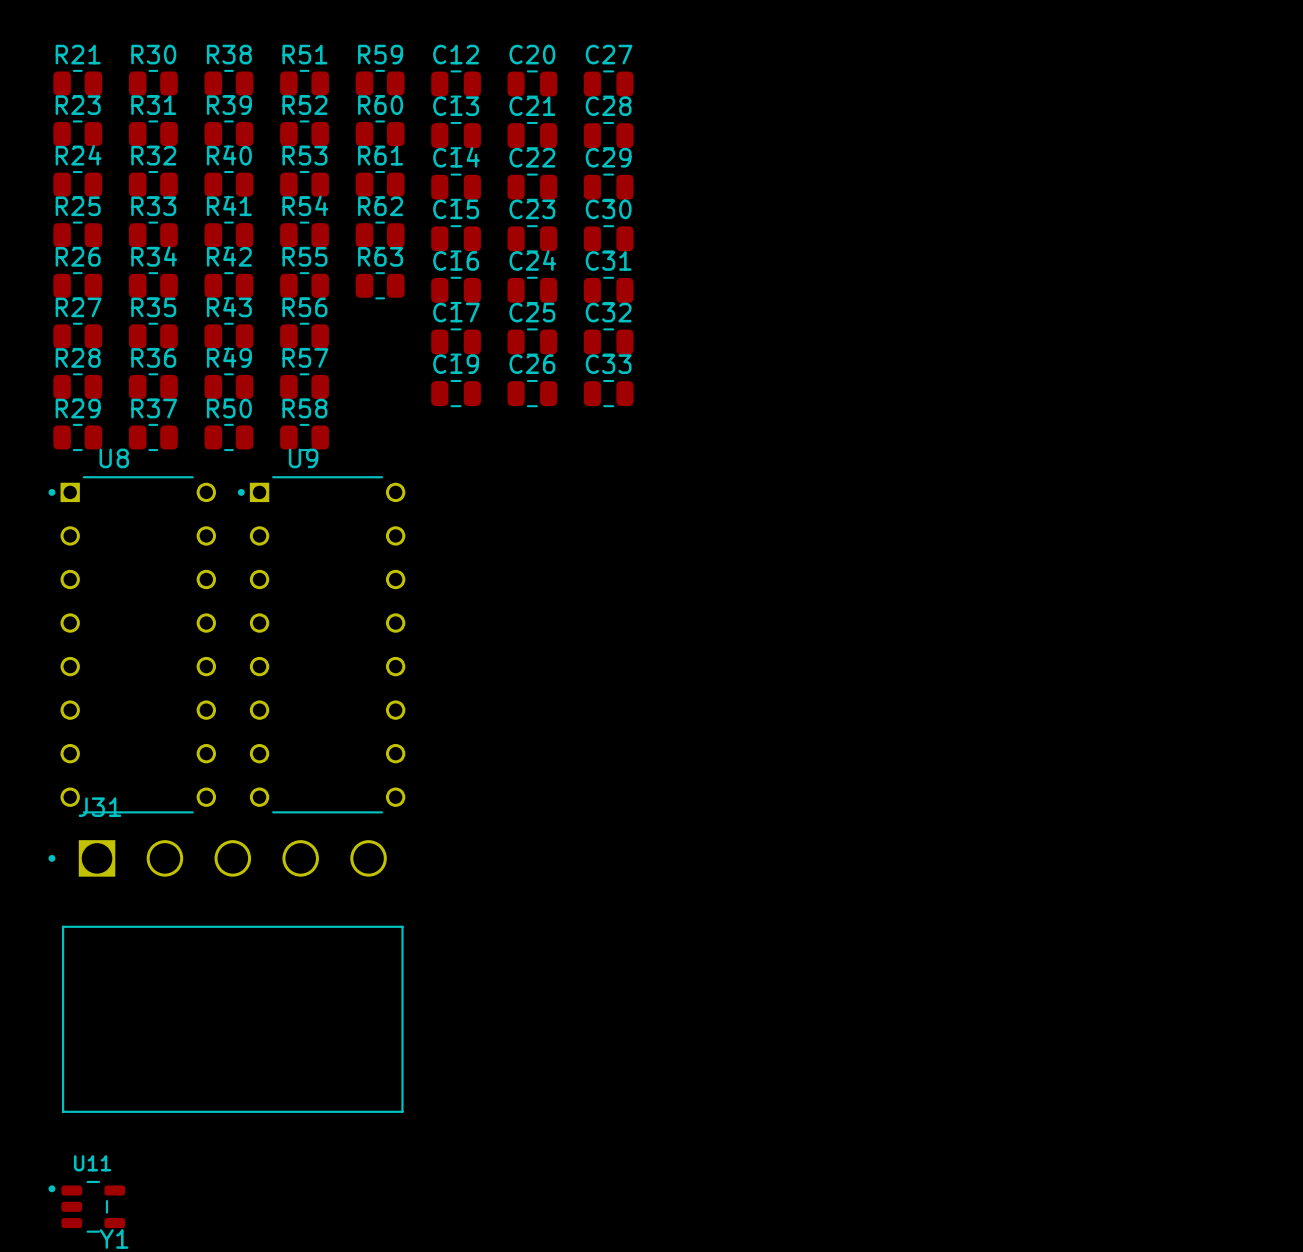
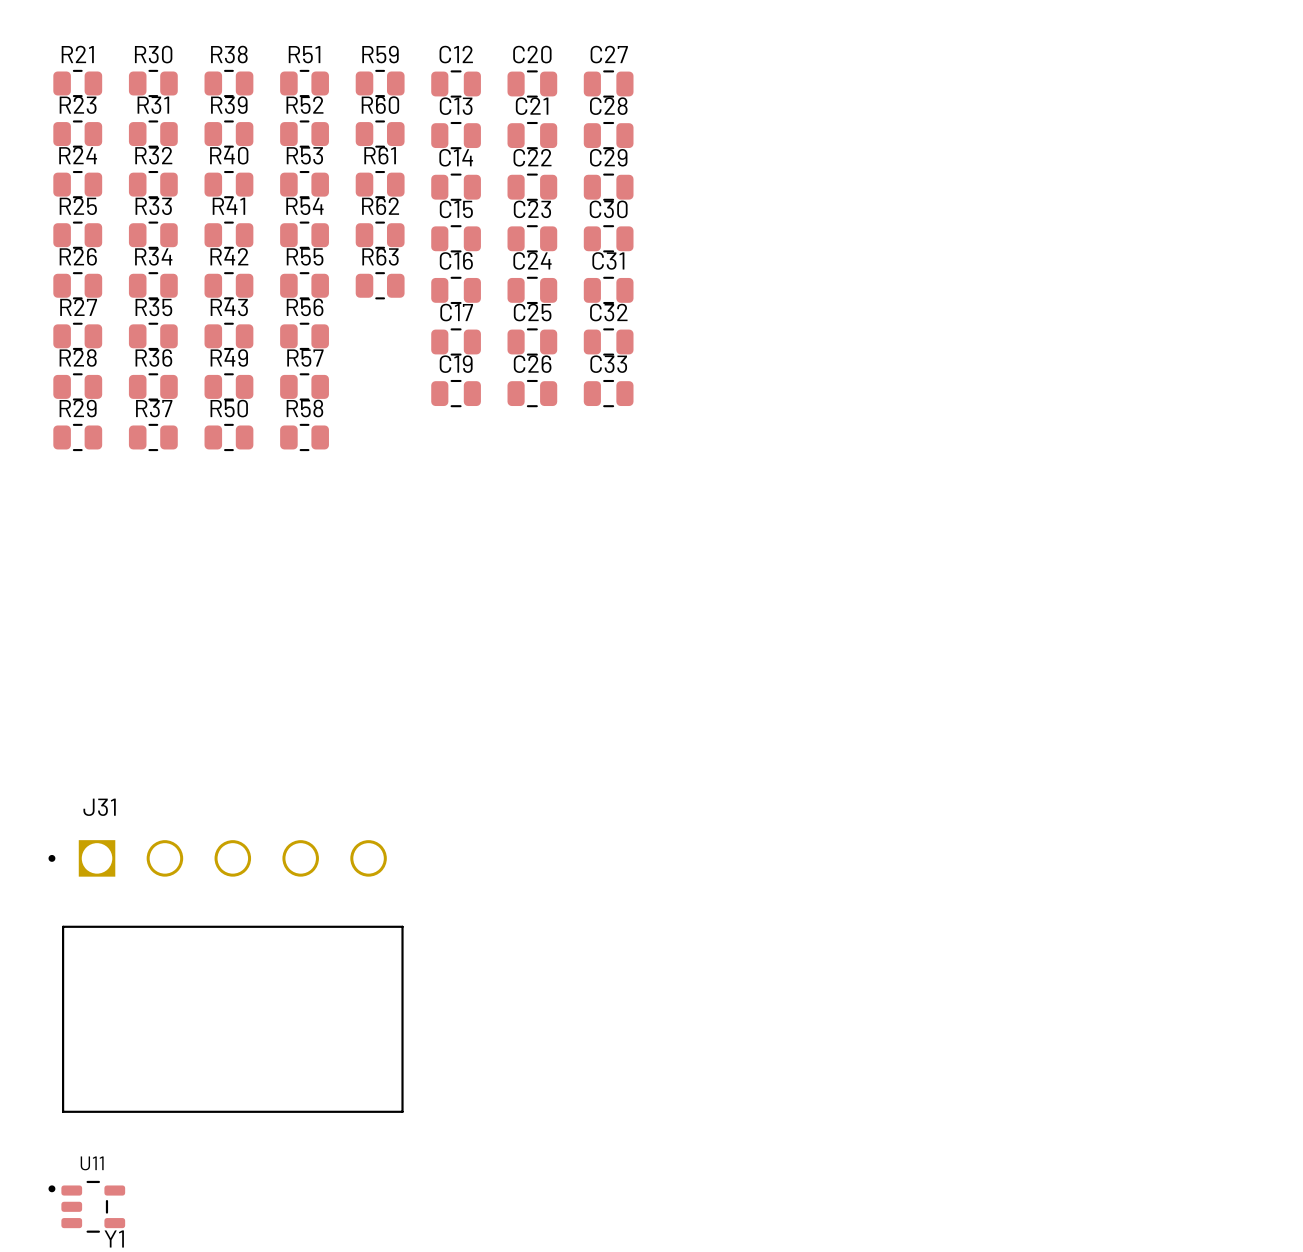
U8: (132, 644) -> none
U9: (321, 644) -> none

